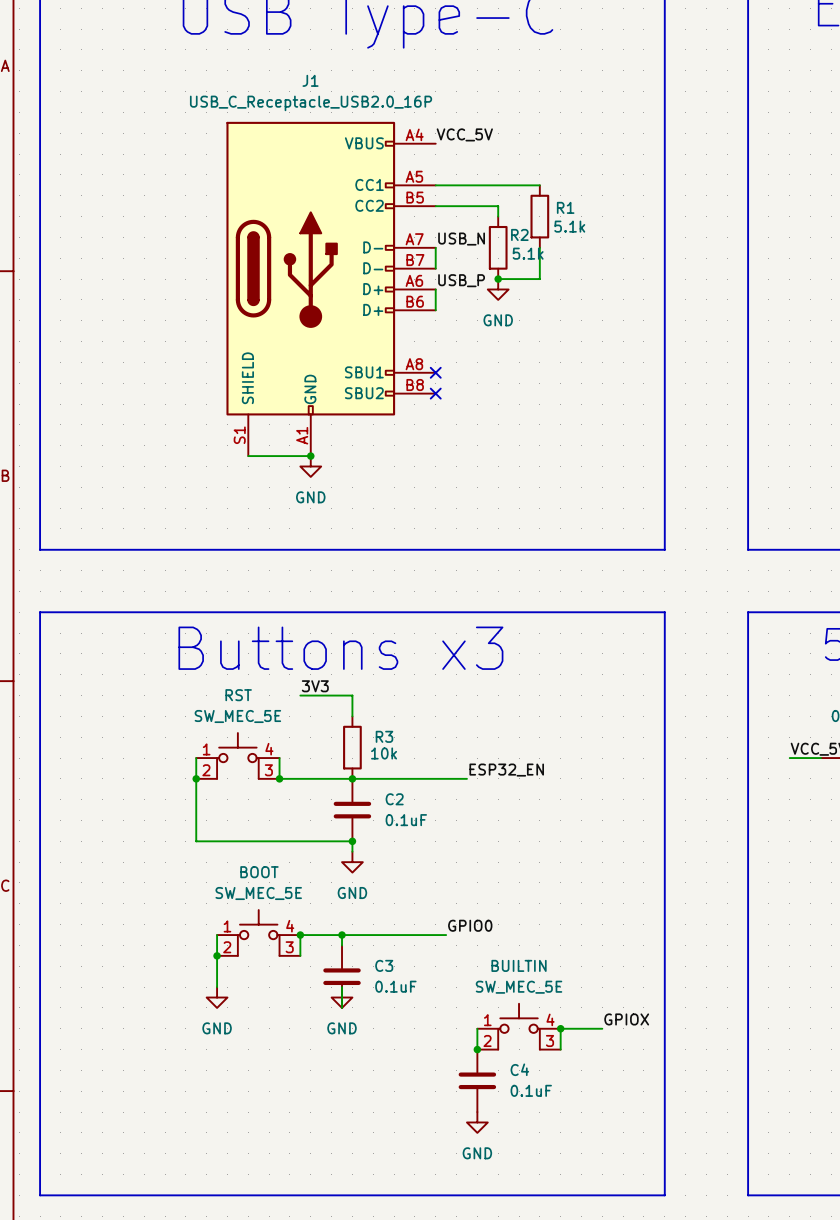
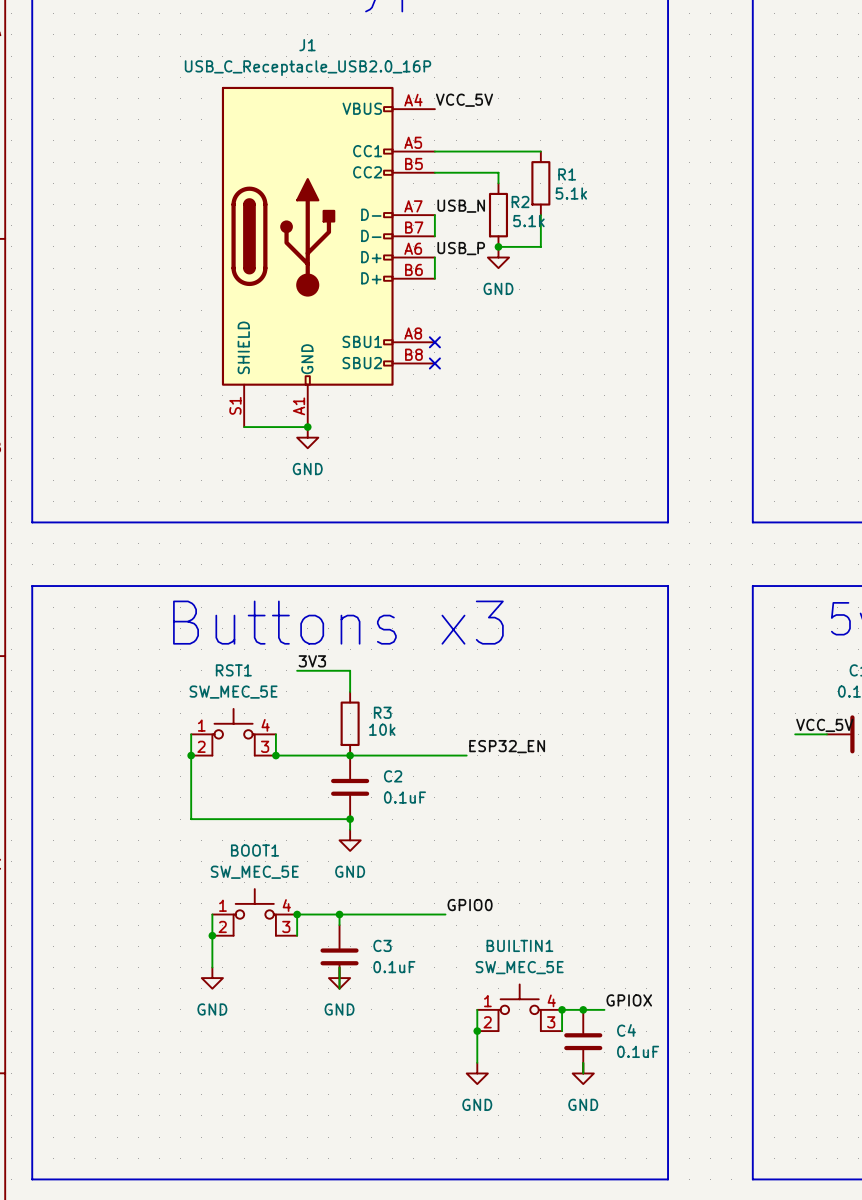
RST name: RST (238, 695) -> RST1 (233, 670)
BOOT name: BOOT (259, 872) -> BOOT1 (255, 850)
BUILTIN name: BUILTIN (519, 965) -> BUILTIN1 (519, 945)
junction: none -> (583, 1009)
C4 position: (477, 1080) -> (583, 1041)
wire: none -> (583, 1062) (583, 1073)
power symbol: none -> GND (583, 1073)
power symbol position: GND (477, 1122) -> GND (477, 1073)

